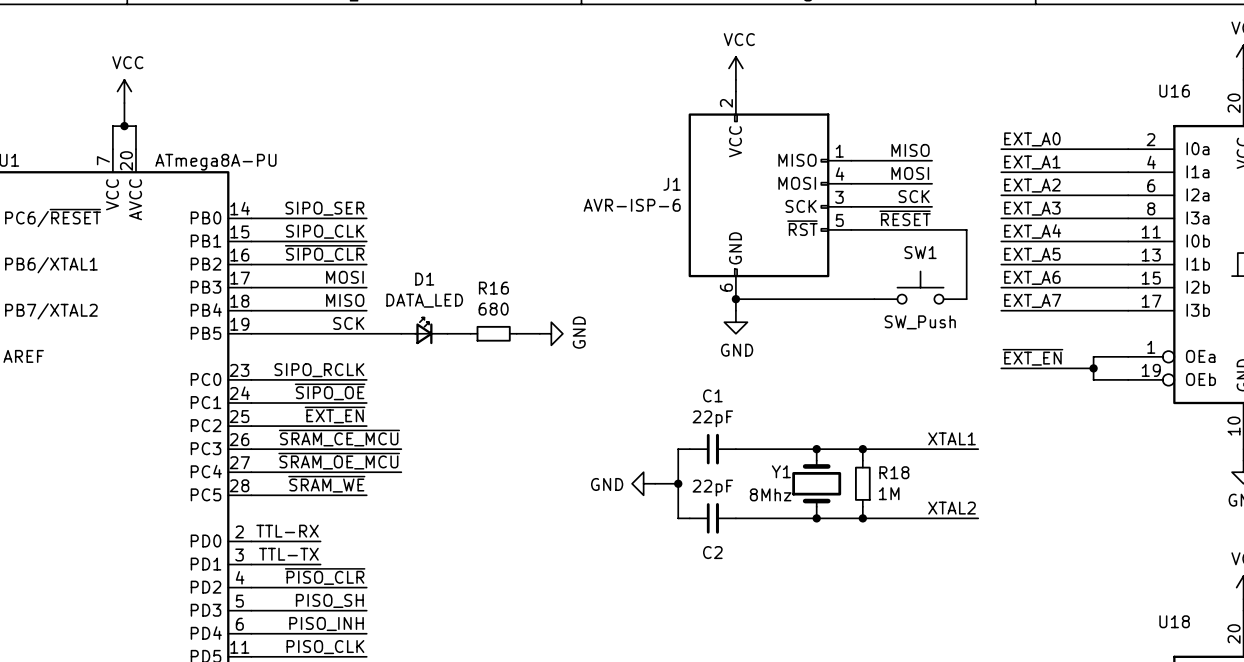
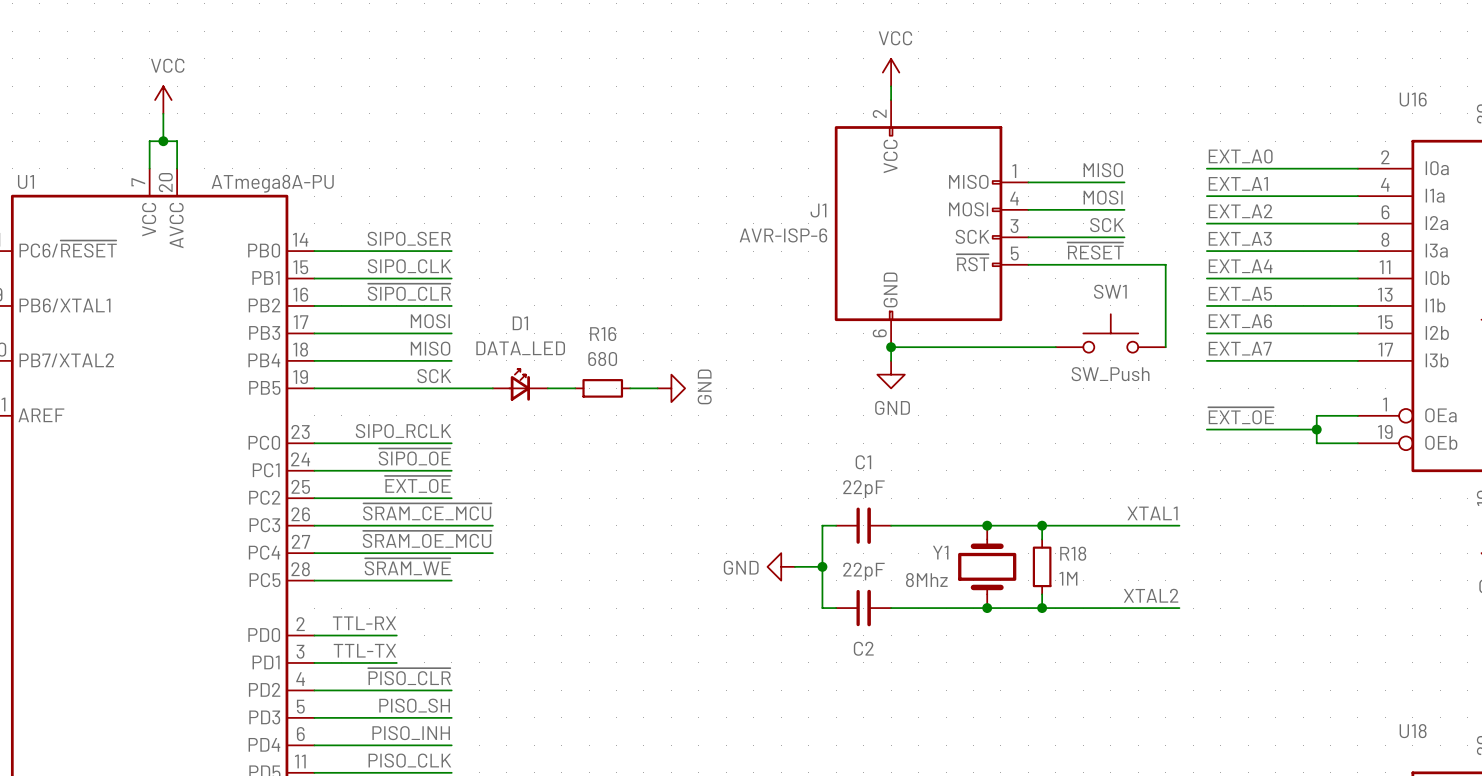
label: ~{EXT_EN} (1032, 357) -> ~{EXT_OE} (1241, 415)
label: ~{EXT_EN} (335, 415) -> ~{EXT_OE} (417, 484)

